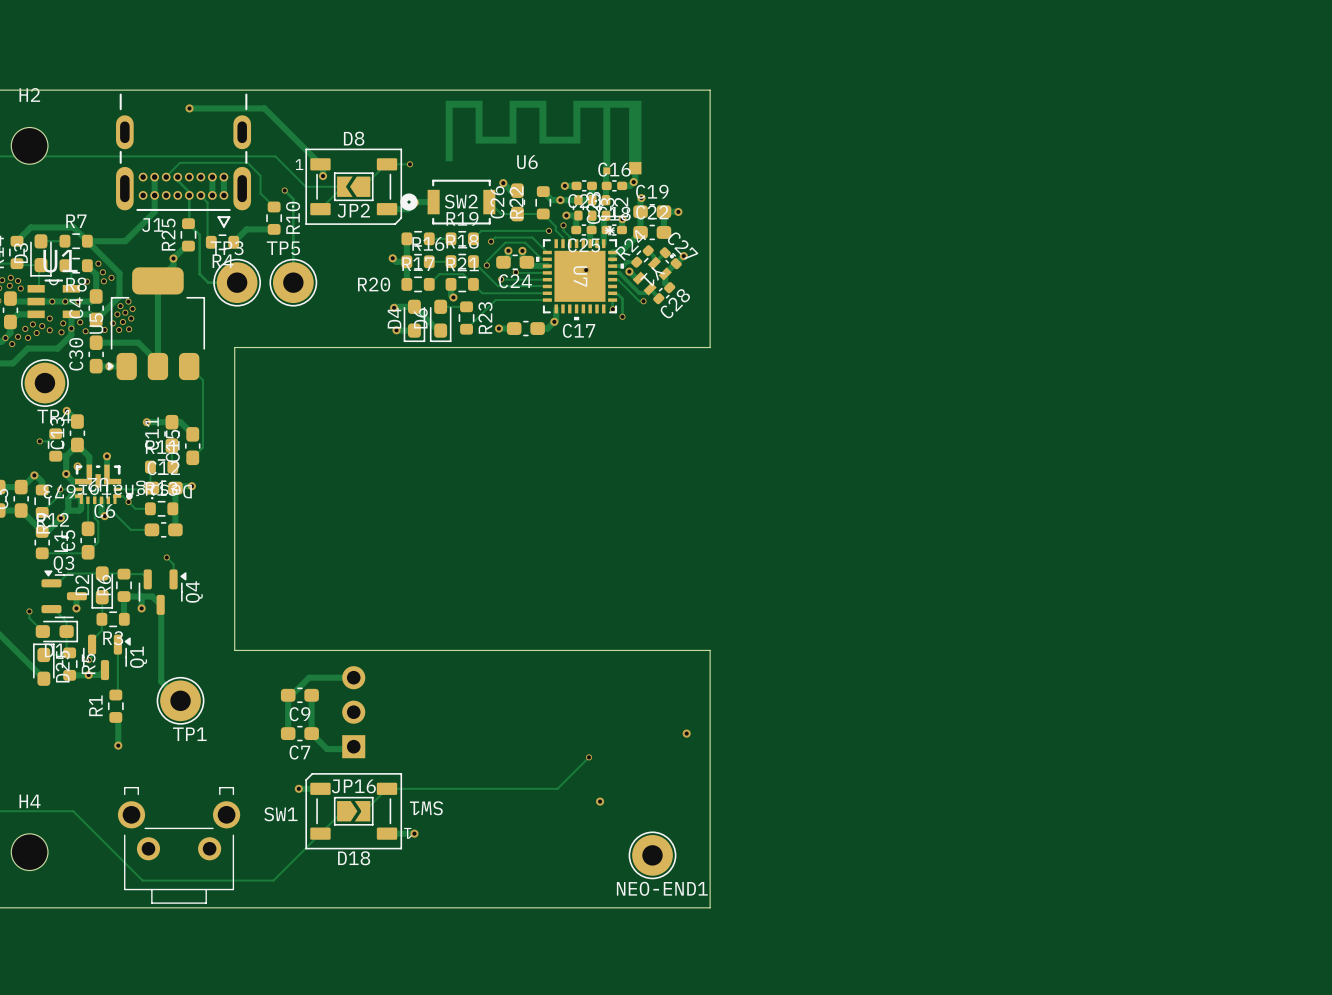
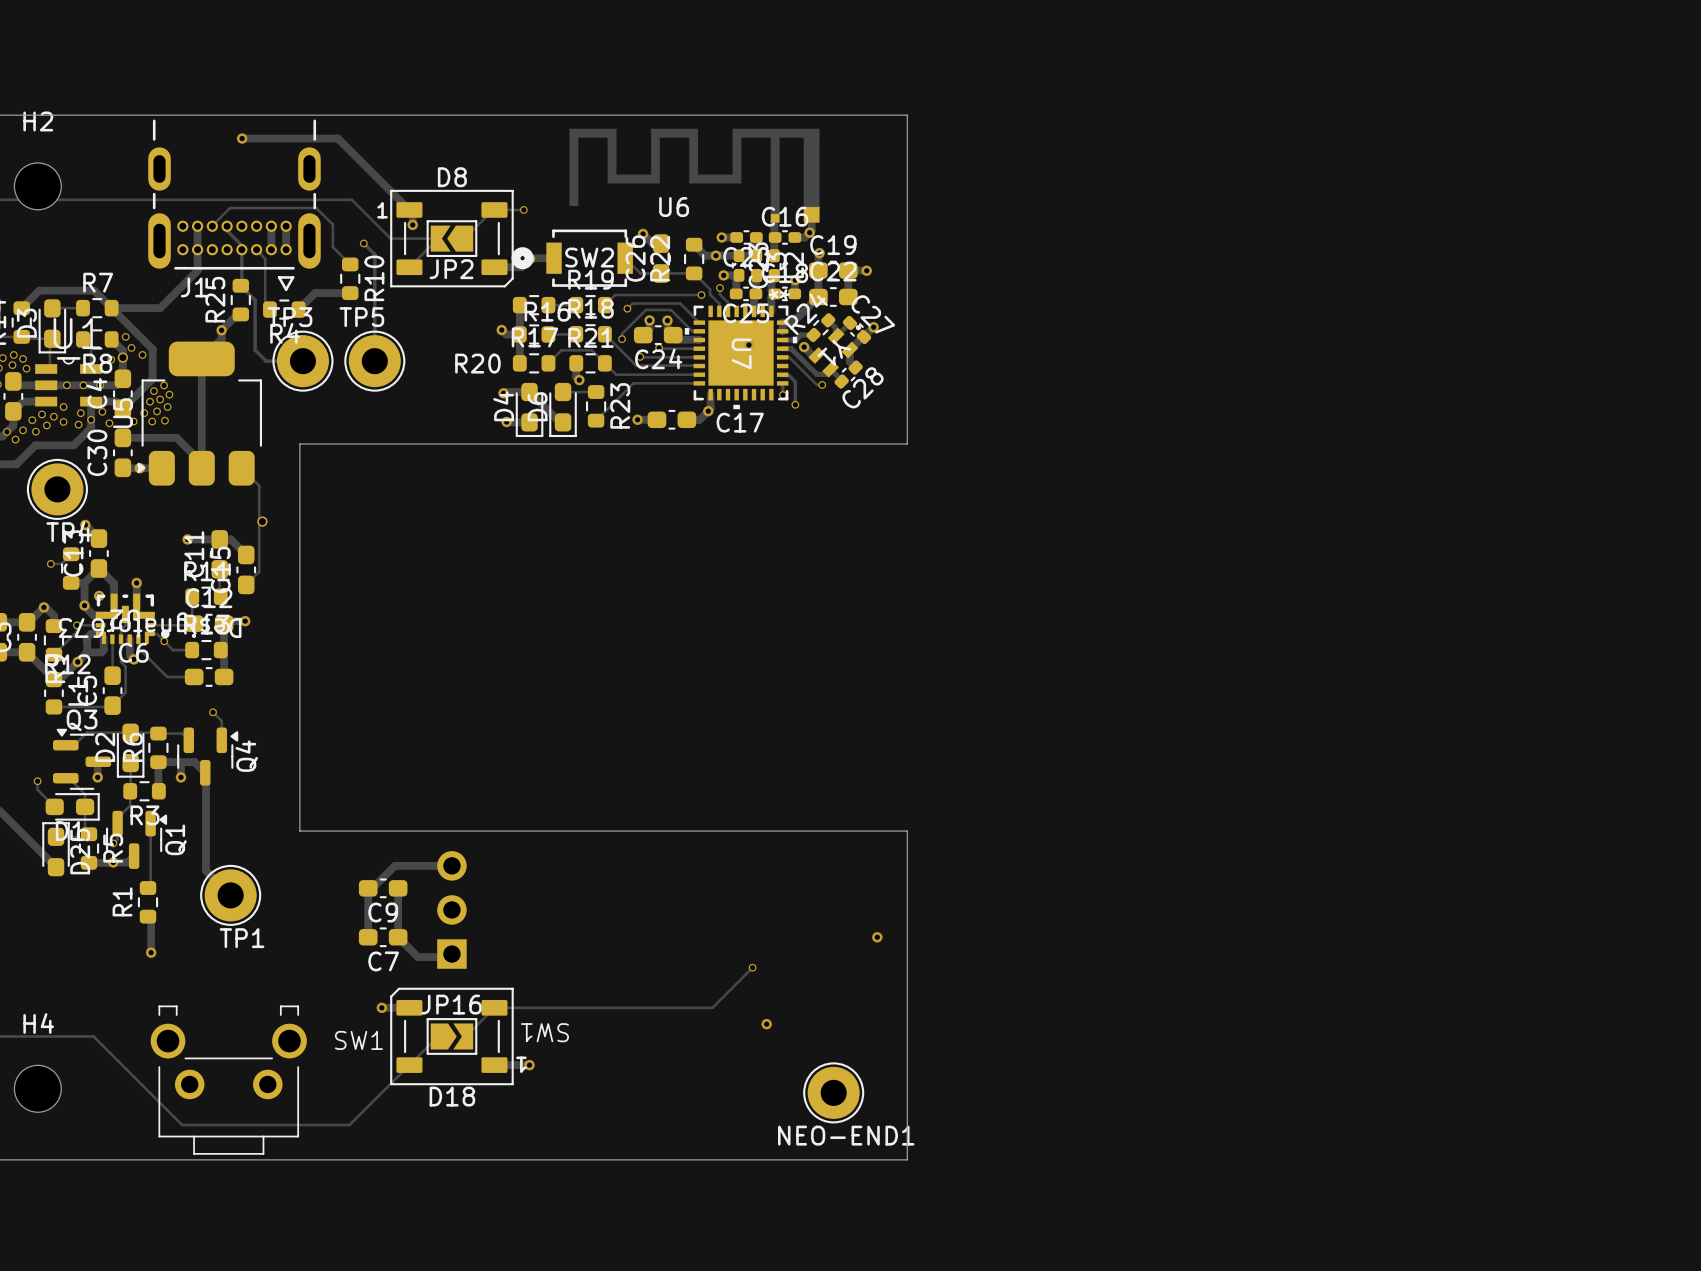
via: none -> (122, 357)
via: (103, 281) -> none
via: none -> (262, 521)

